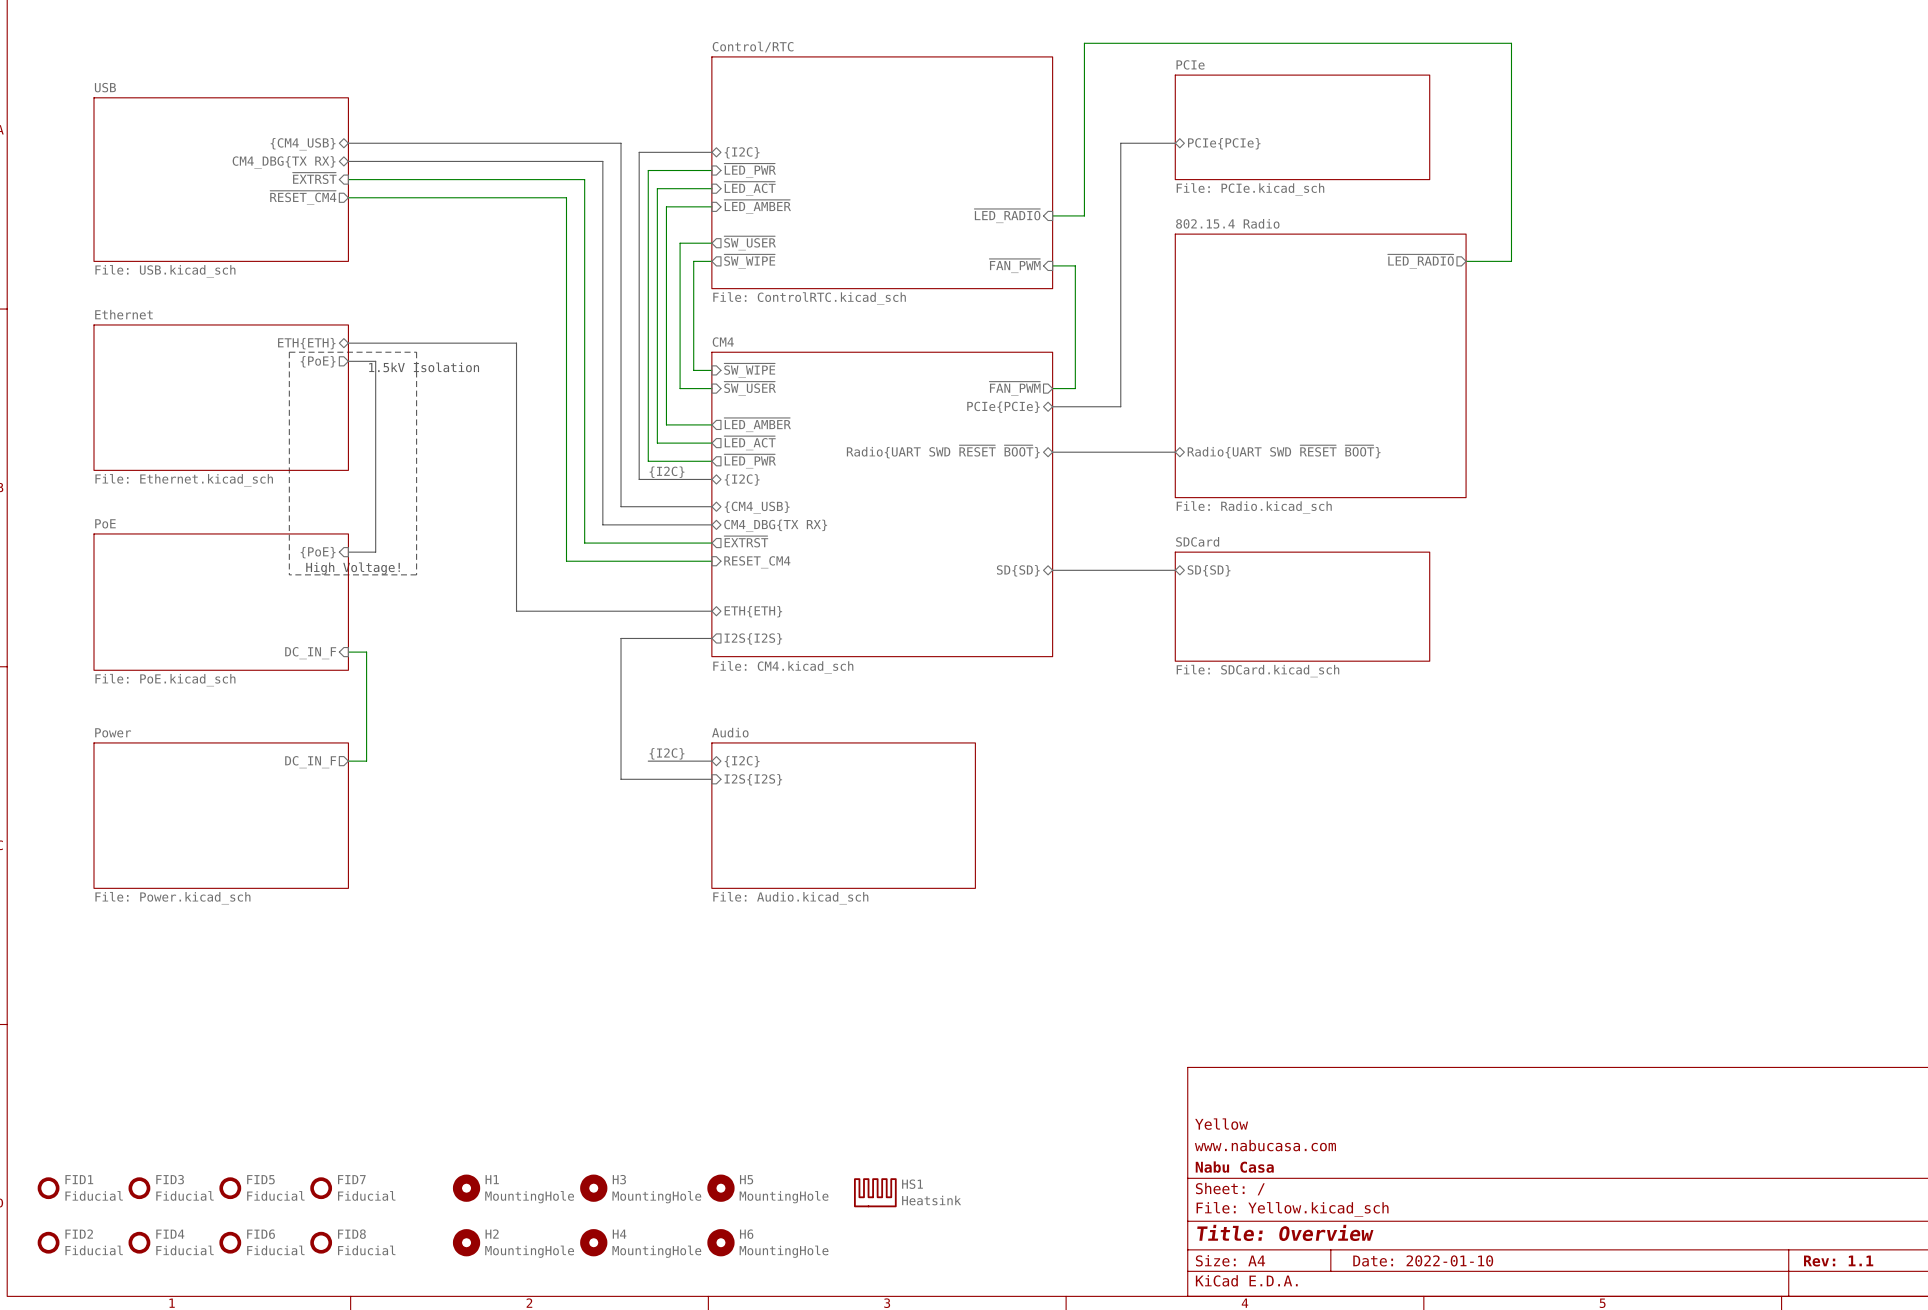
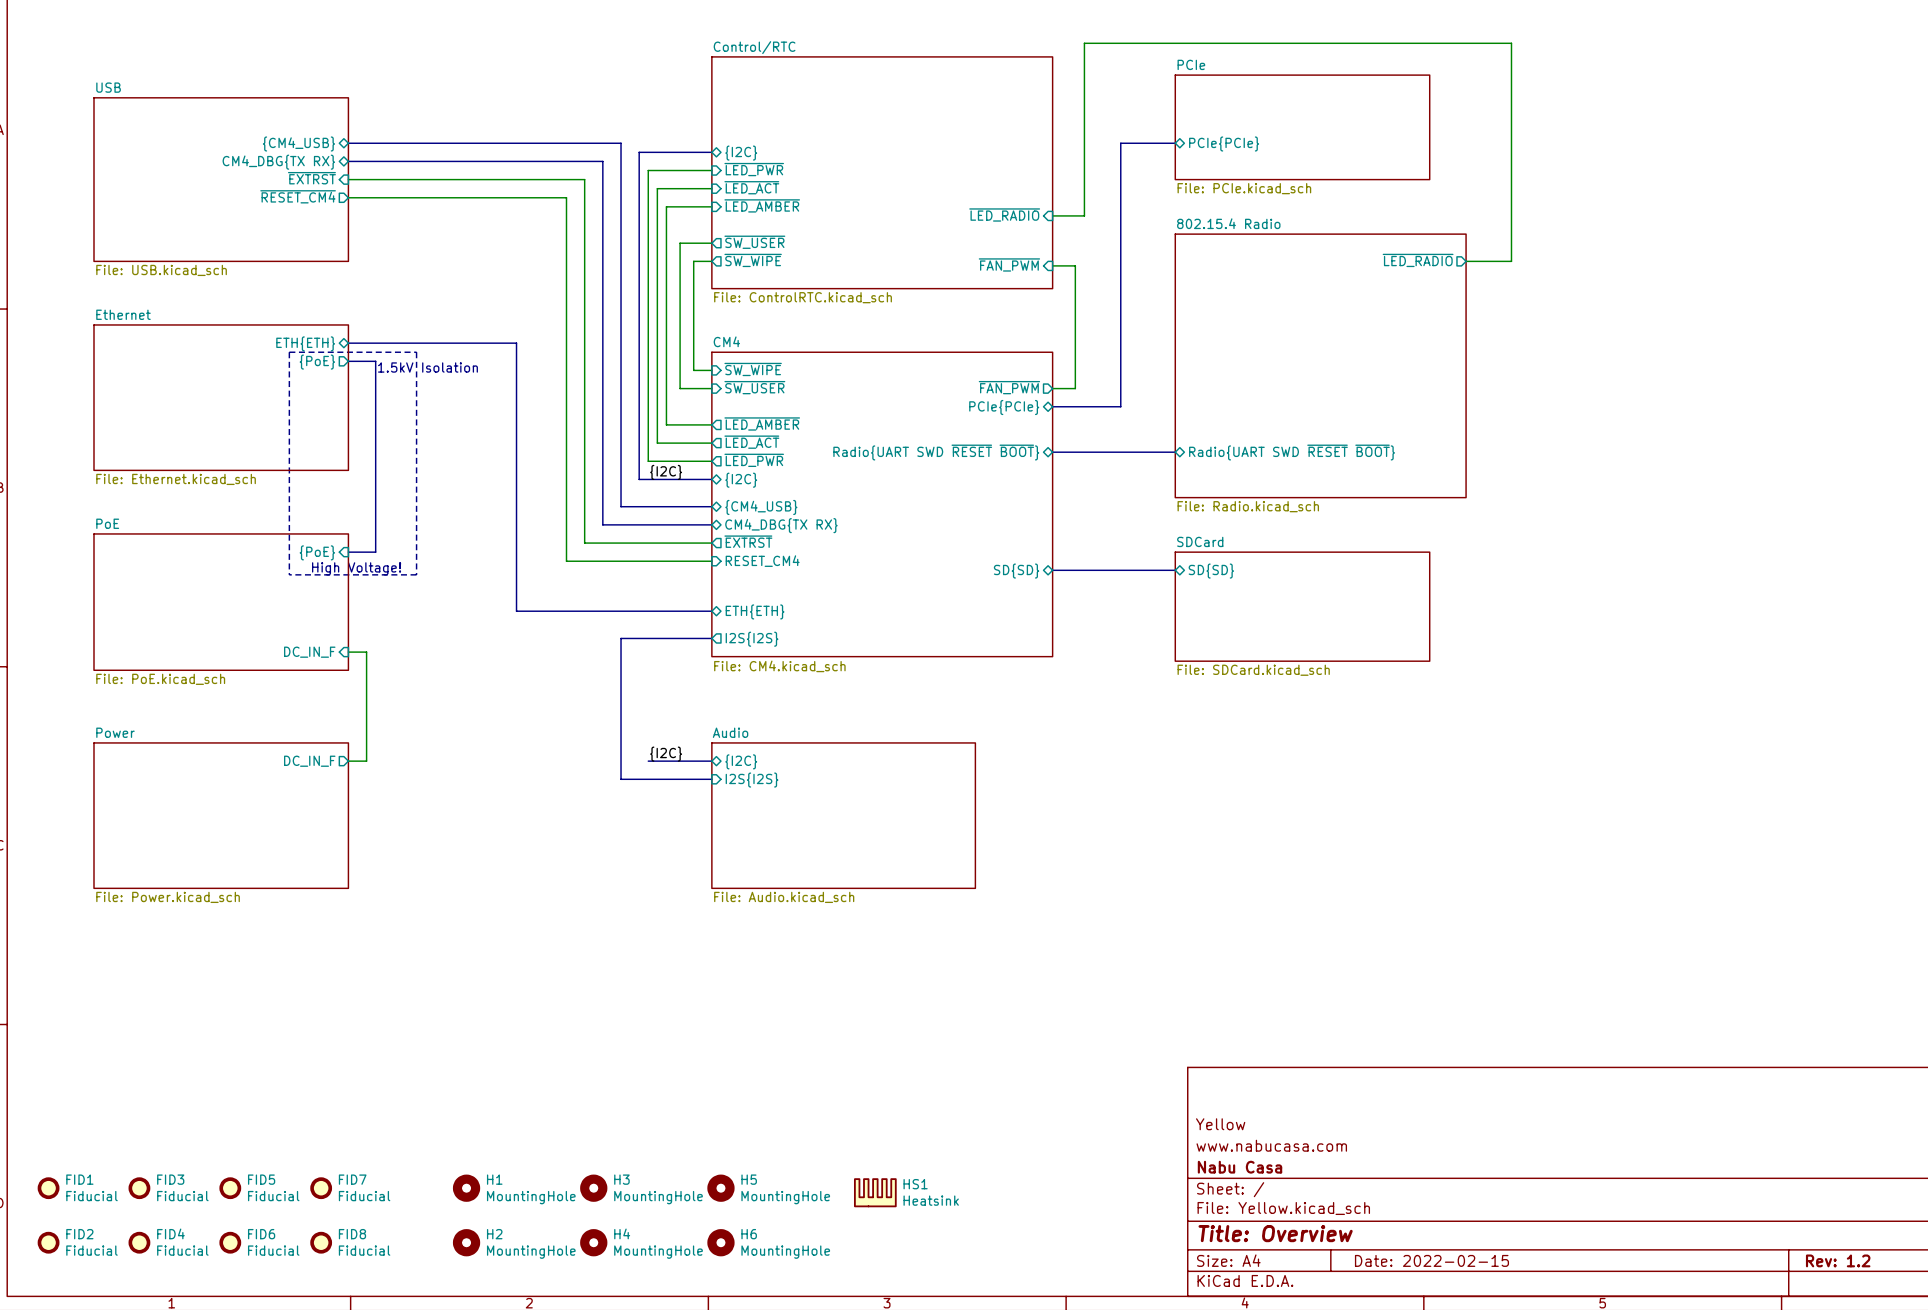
title block: Date: 2022-01-10 (1423, 1260) -> Date: 2022-02-15 (1431, 1260)
title block: Rev: 1.1 (1838, 1261) -> Rev: 1.2 (1838, 1260)

